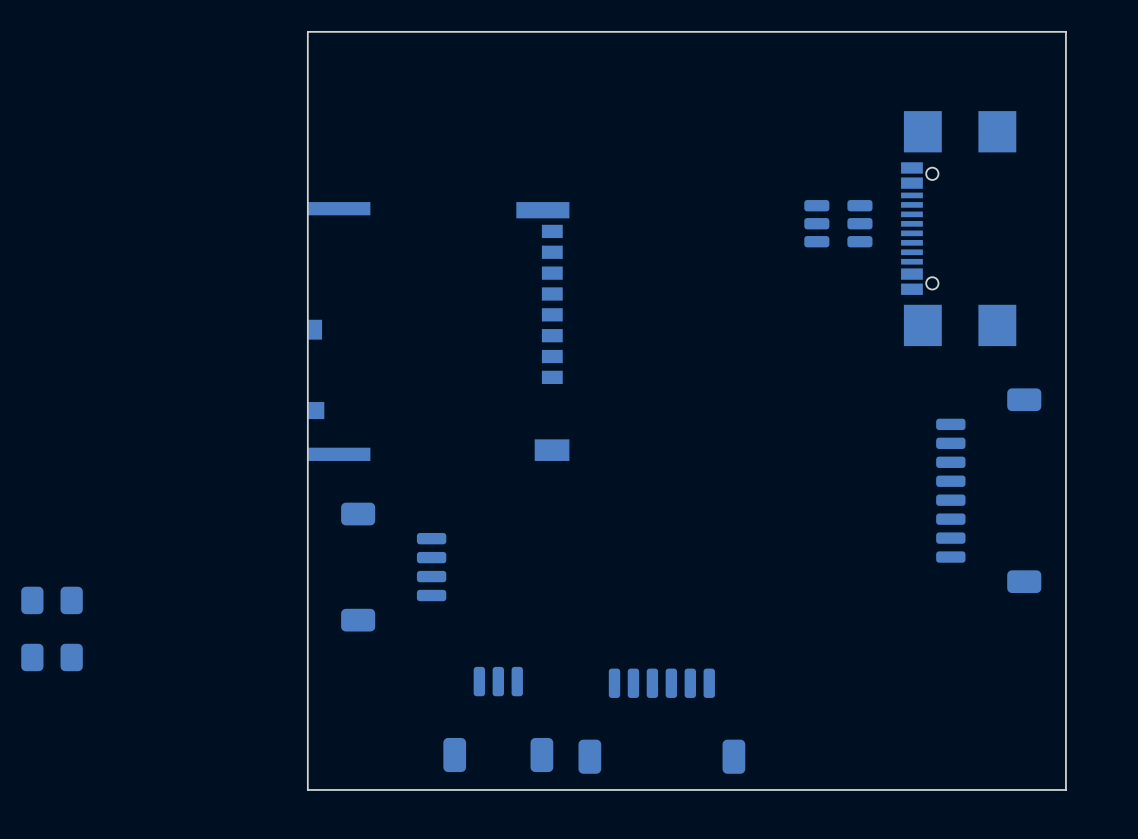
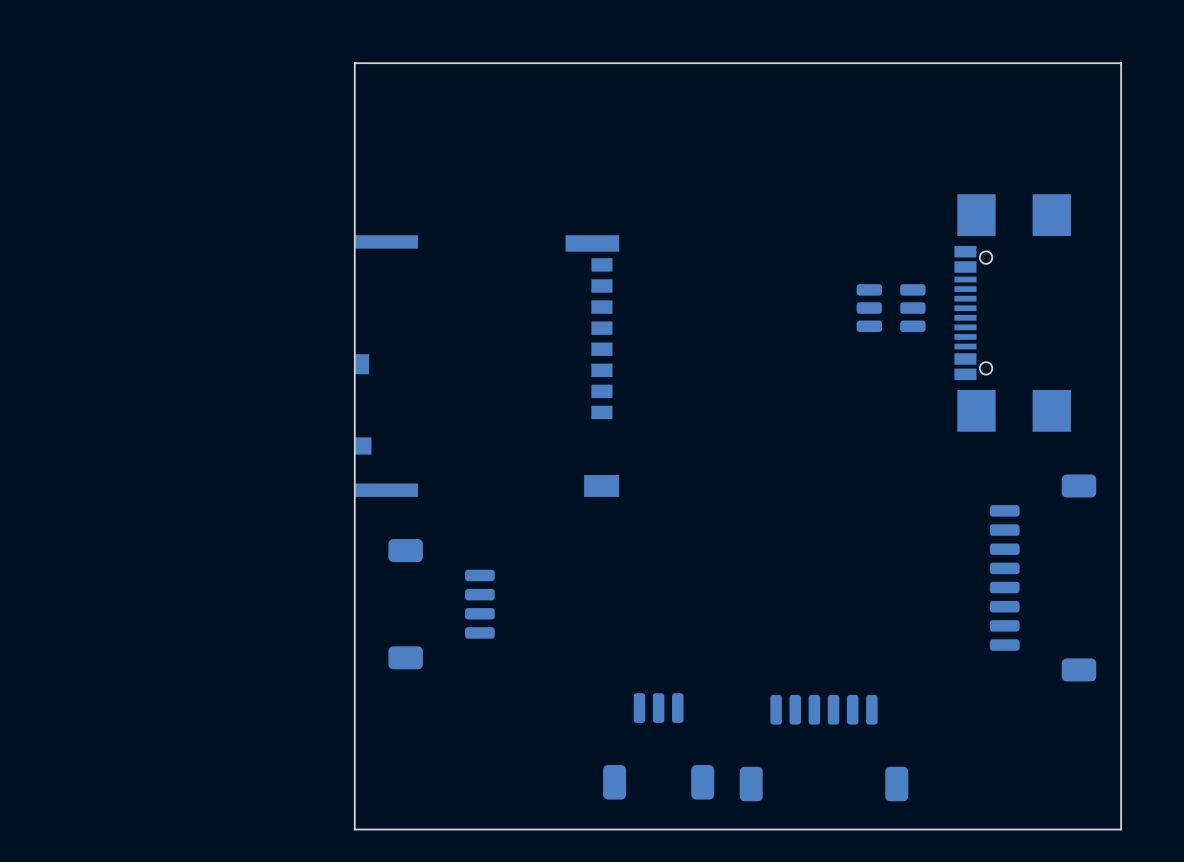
part position: (838, 223) -> (891, 308)
part position: (958, 228) -> (1012, 313)
part position: (988, 490) -> (1043, 577)
part: (52, 600) -> none
part: (52, 657) -> none
part position: (498, 719) -> (658, 746)
part position: (661, 721) -> (823, 748)

